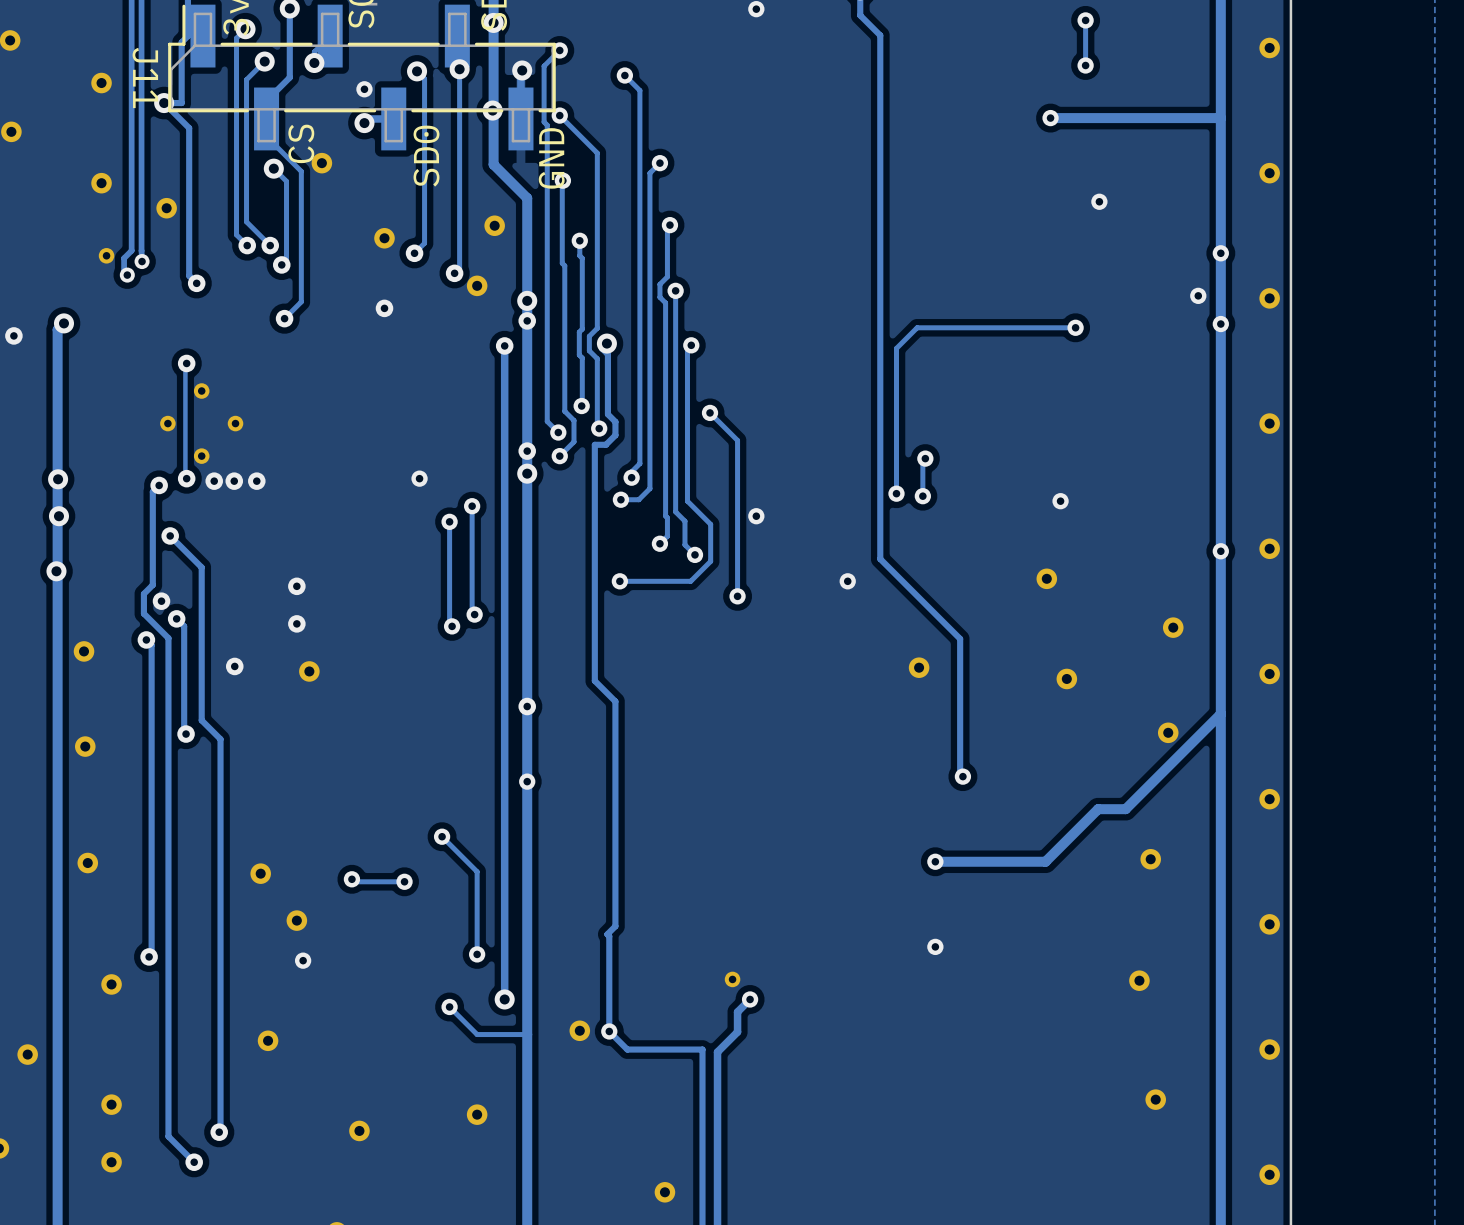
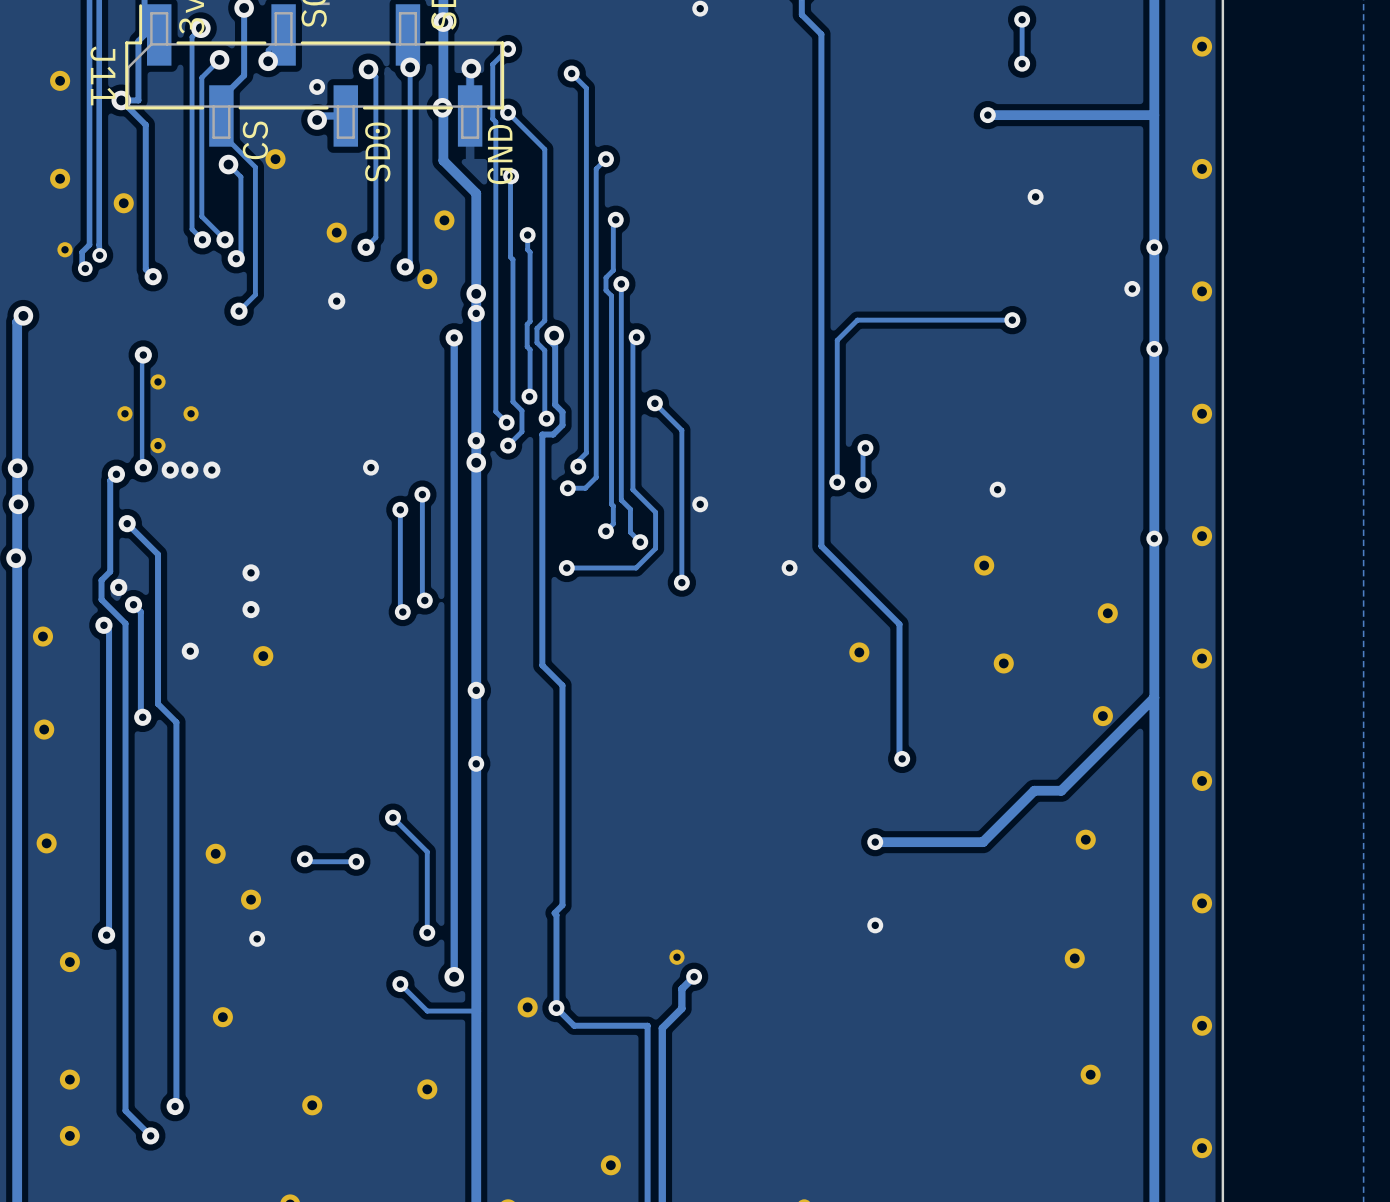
via position: (1220, 324) -> (1154, 348)

